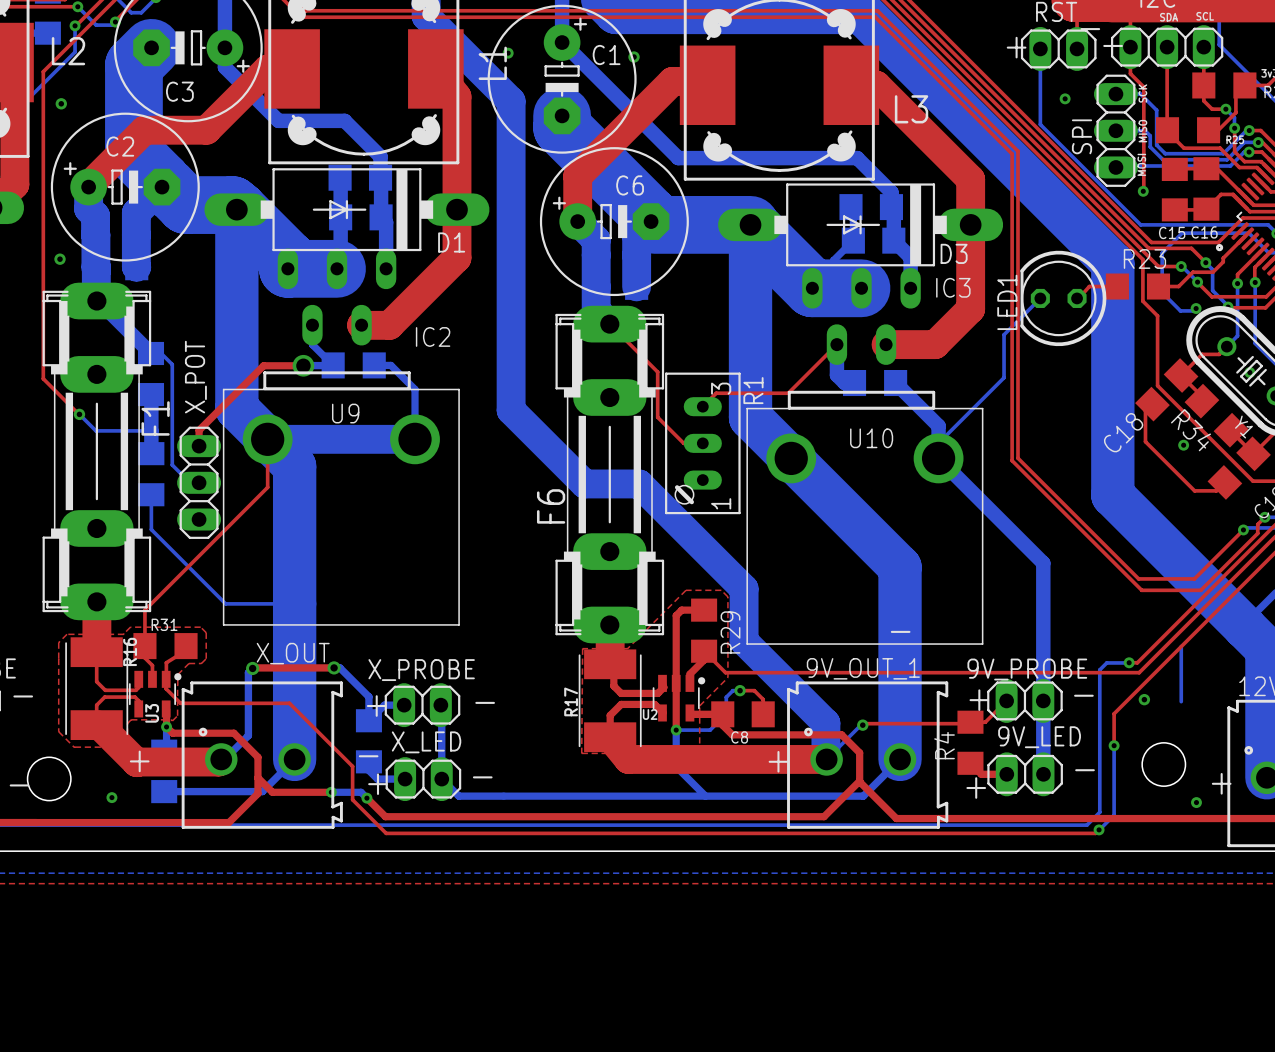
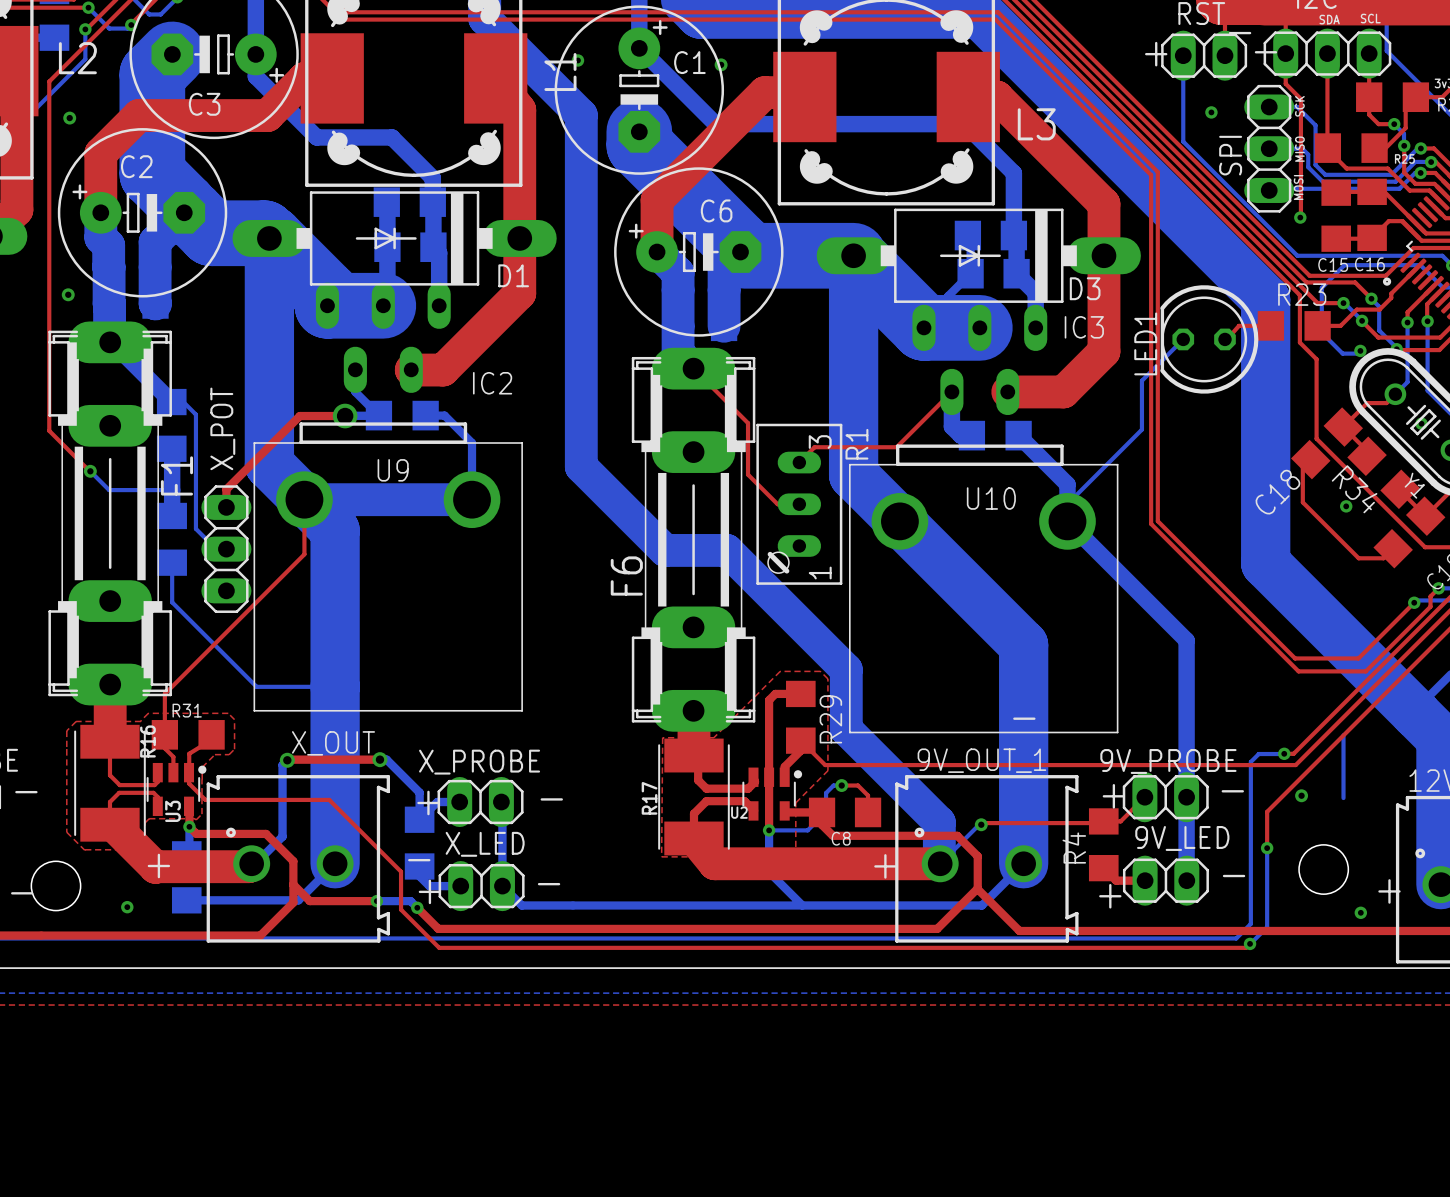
top track: (235, 101) (206, 130) (144, 130) (88, 185) -> (267, 115) (138, 115) (100, 153) (100, 211)
bottom track: (629, 109) (678, 158) (857, 158) (891, 192) -> (715, 124) (964, 124) (1013, 173) (1013, 218)

